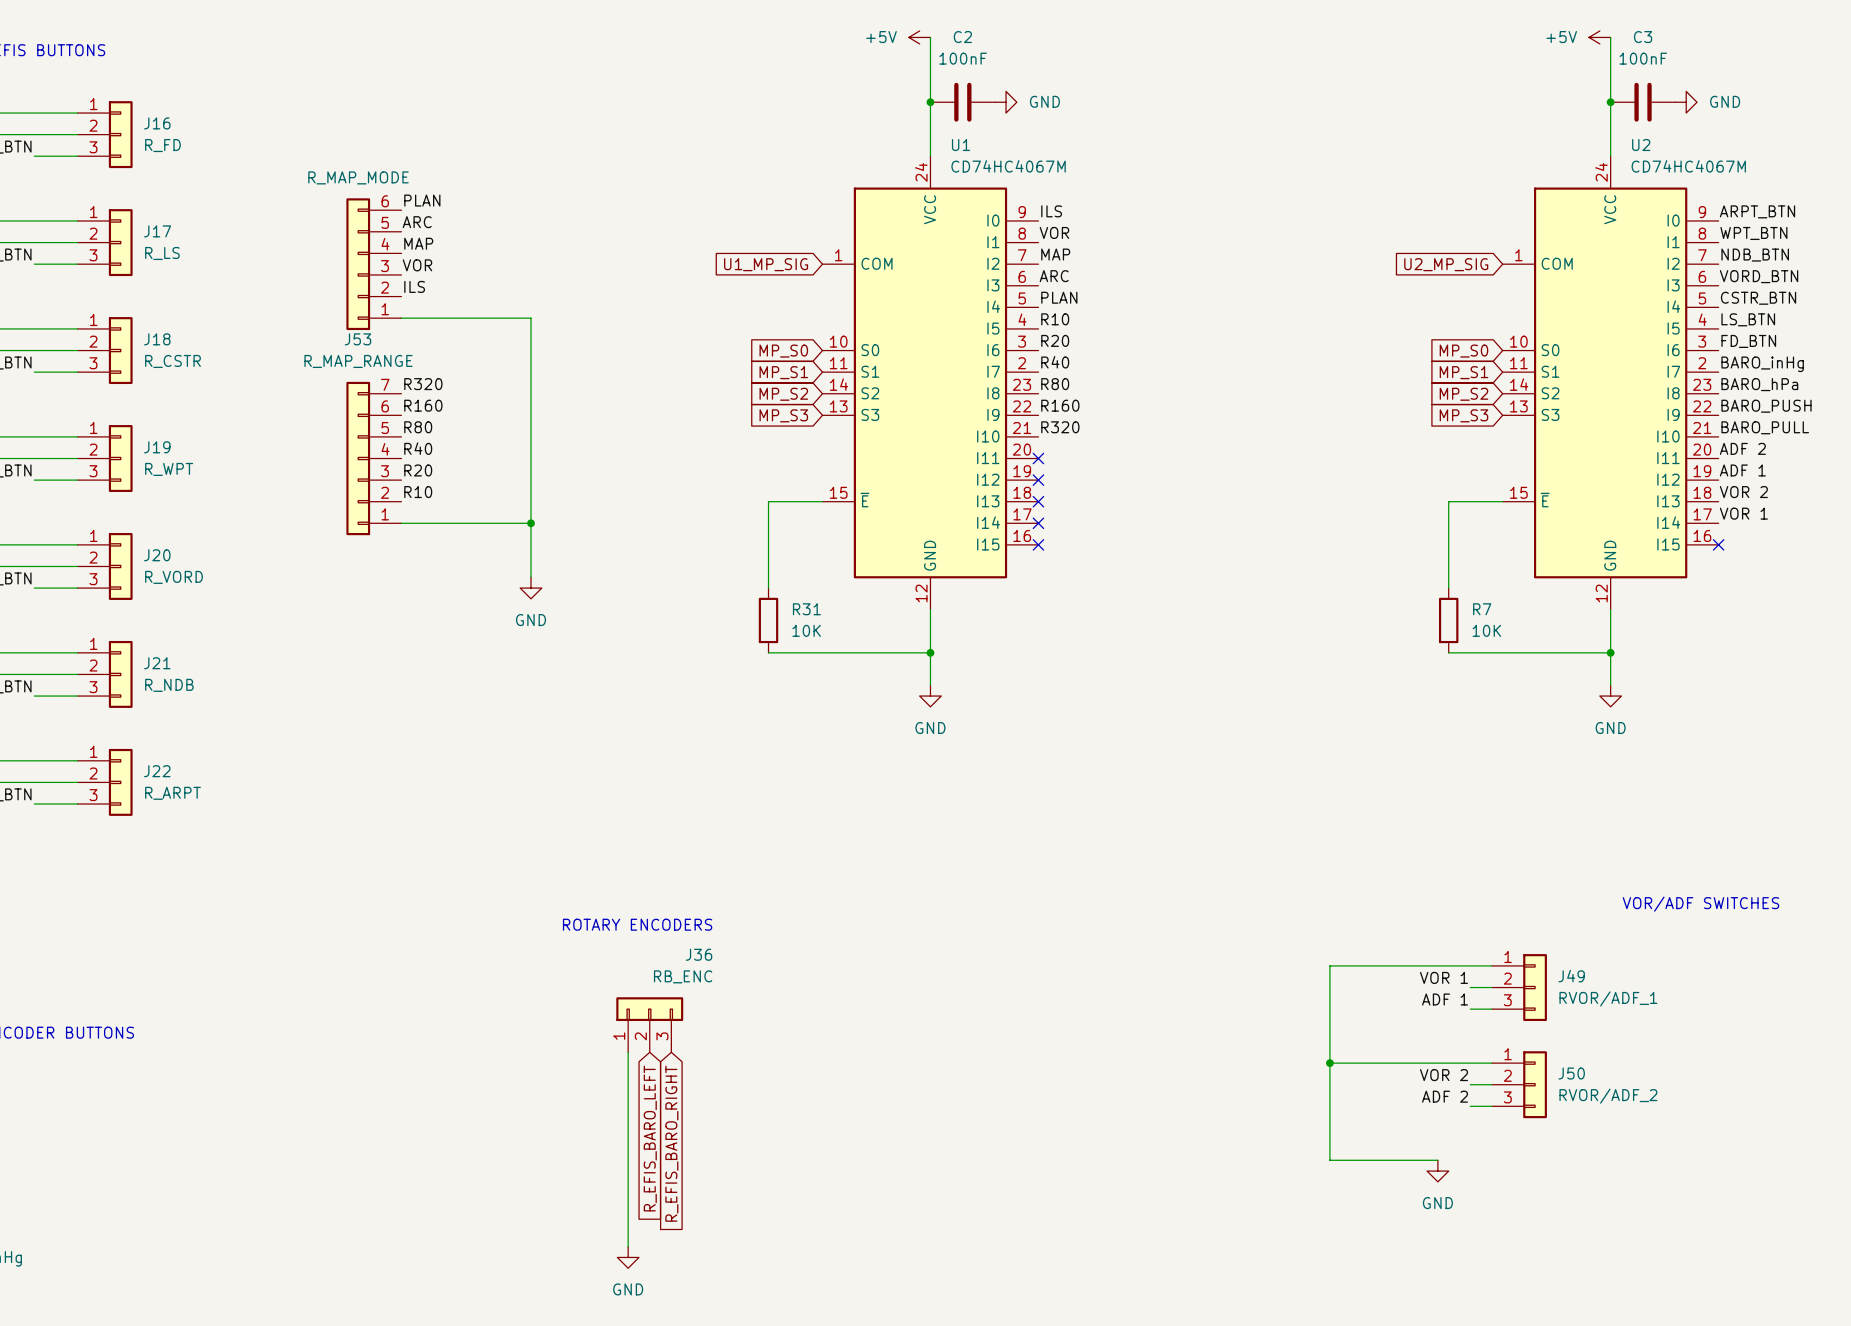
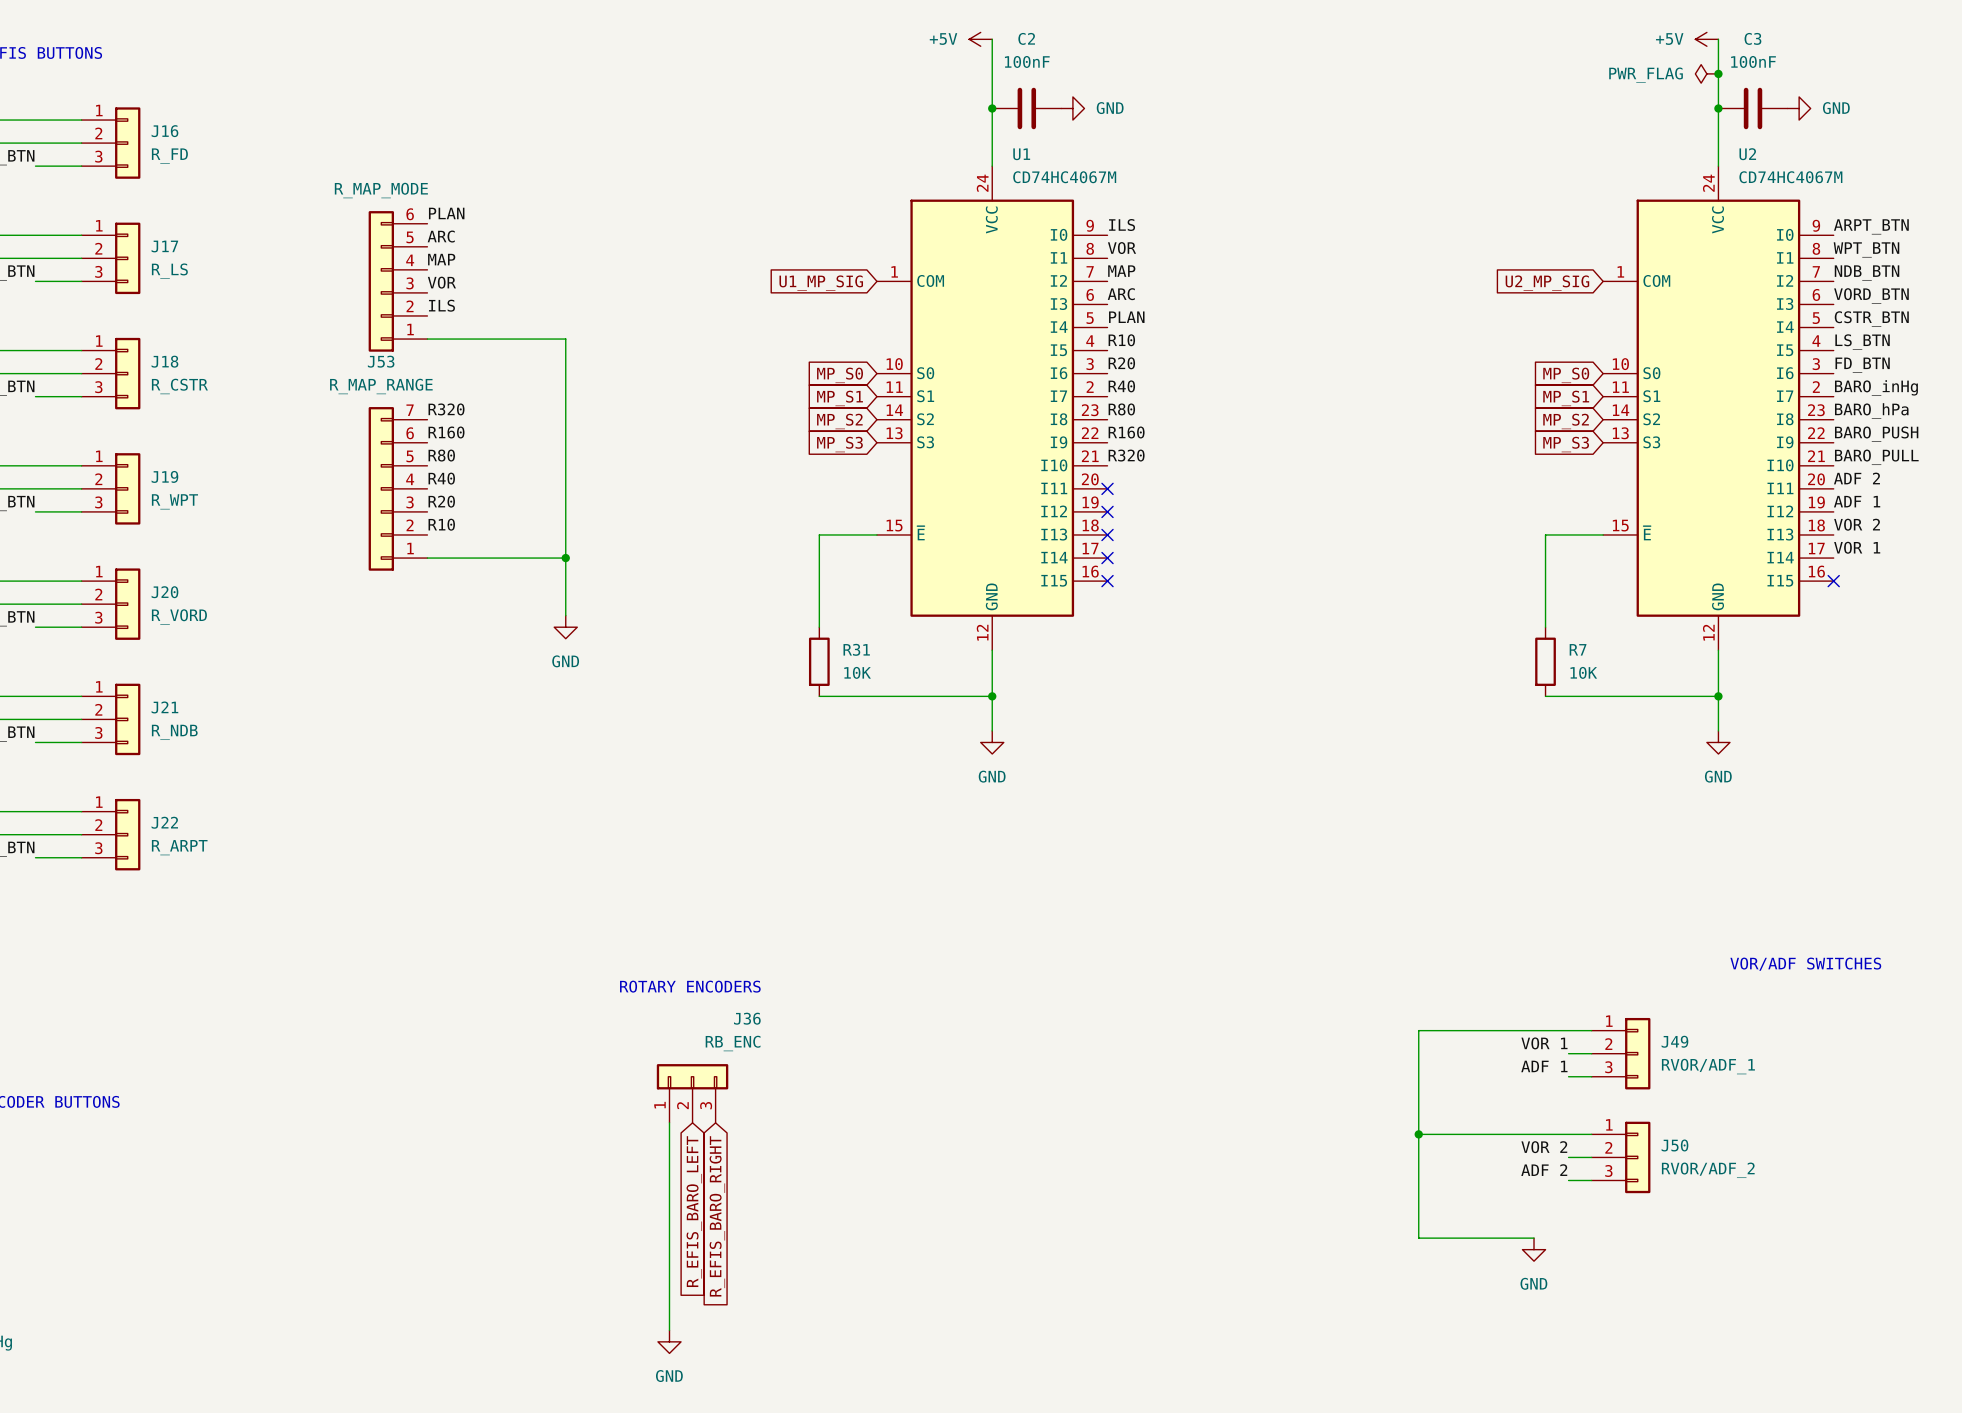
power symbol: none -> PWR_FLAG (1706, 73)
junction: none -> (1718, 73)

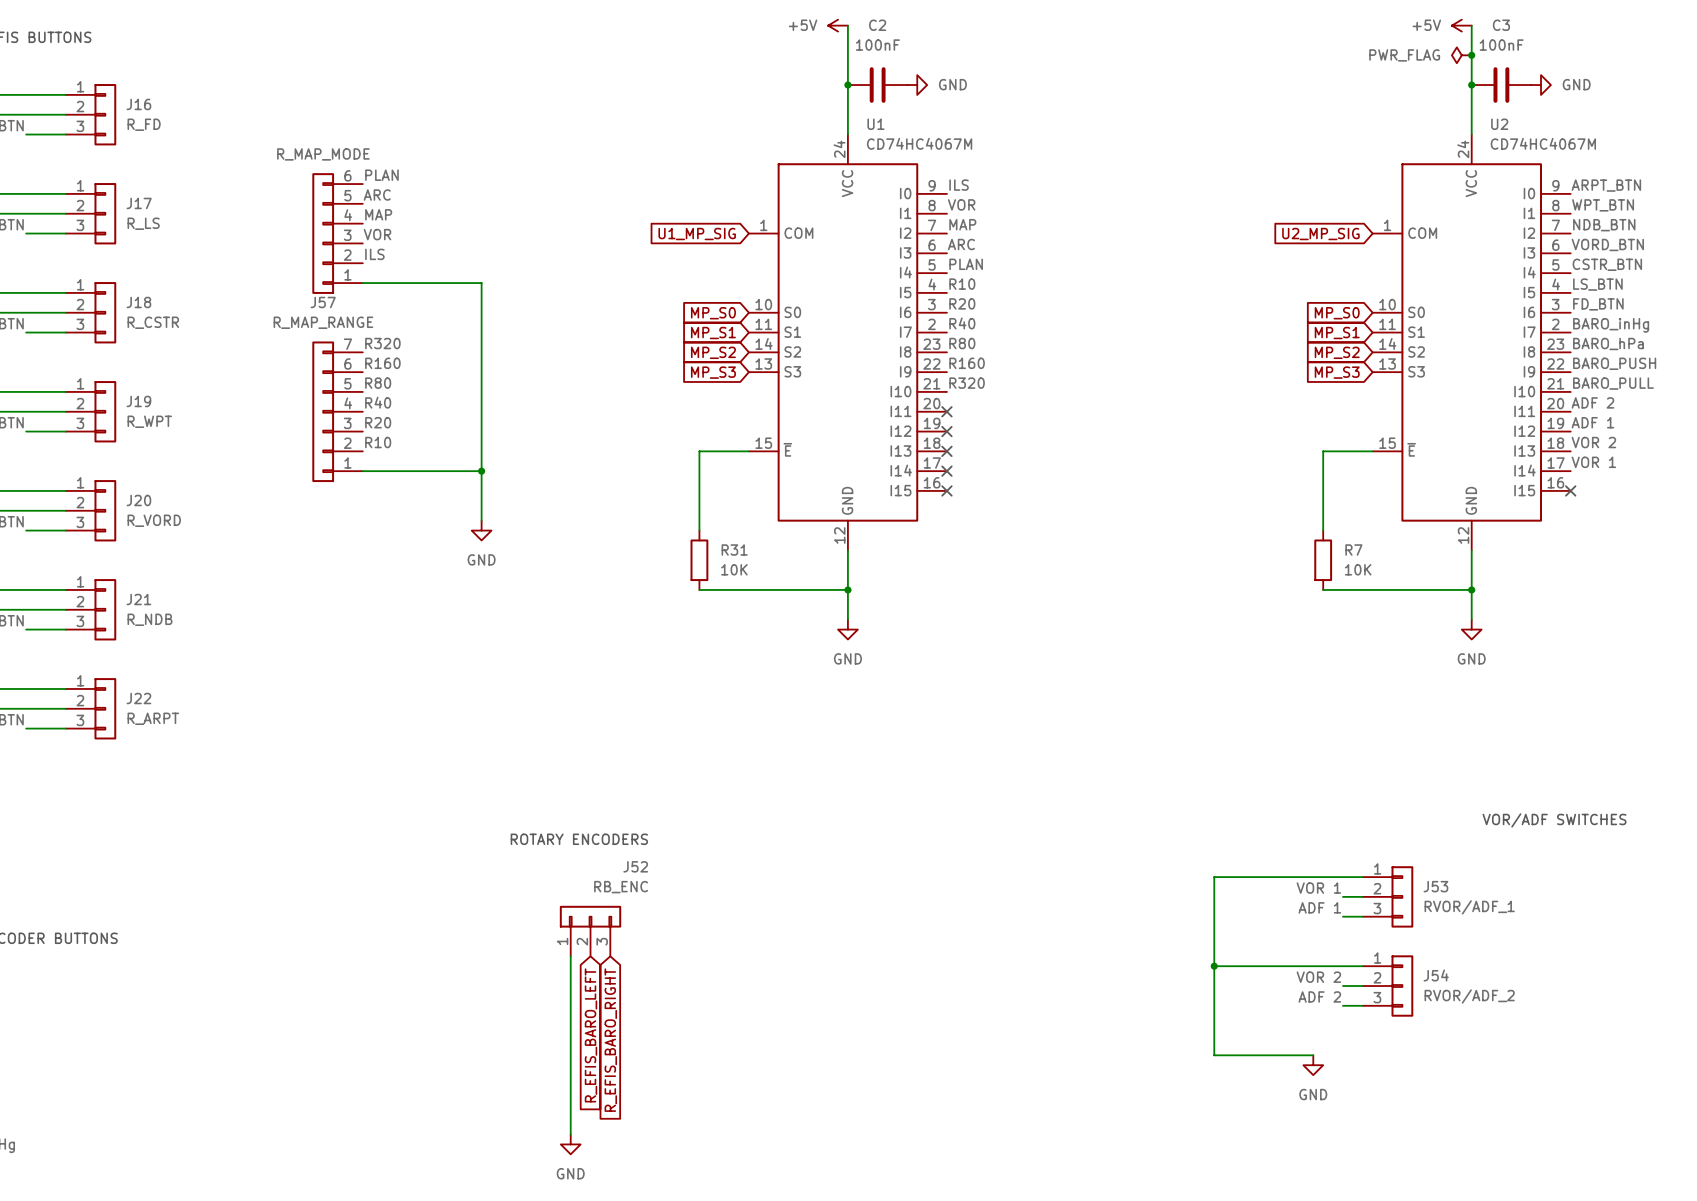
J53 name: J53 (381, 361) -> J57 (323, 302)
J36 name: J36 (747, 1018) -> J52 (635, 866)
J49 name: J49 (1674, 1041) -> J53 (1435, 886)
J50 name: J50 (1674, 1145) -> J54 (1436, 975)

